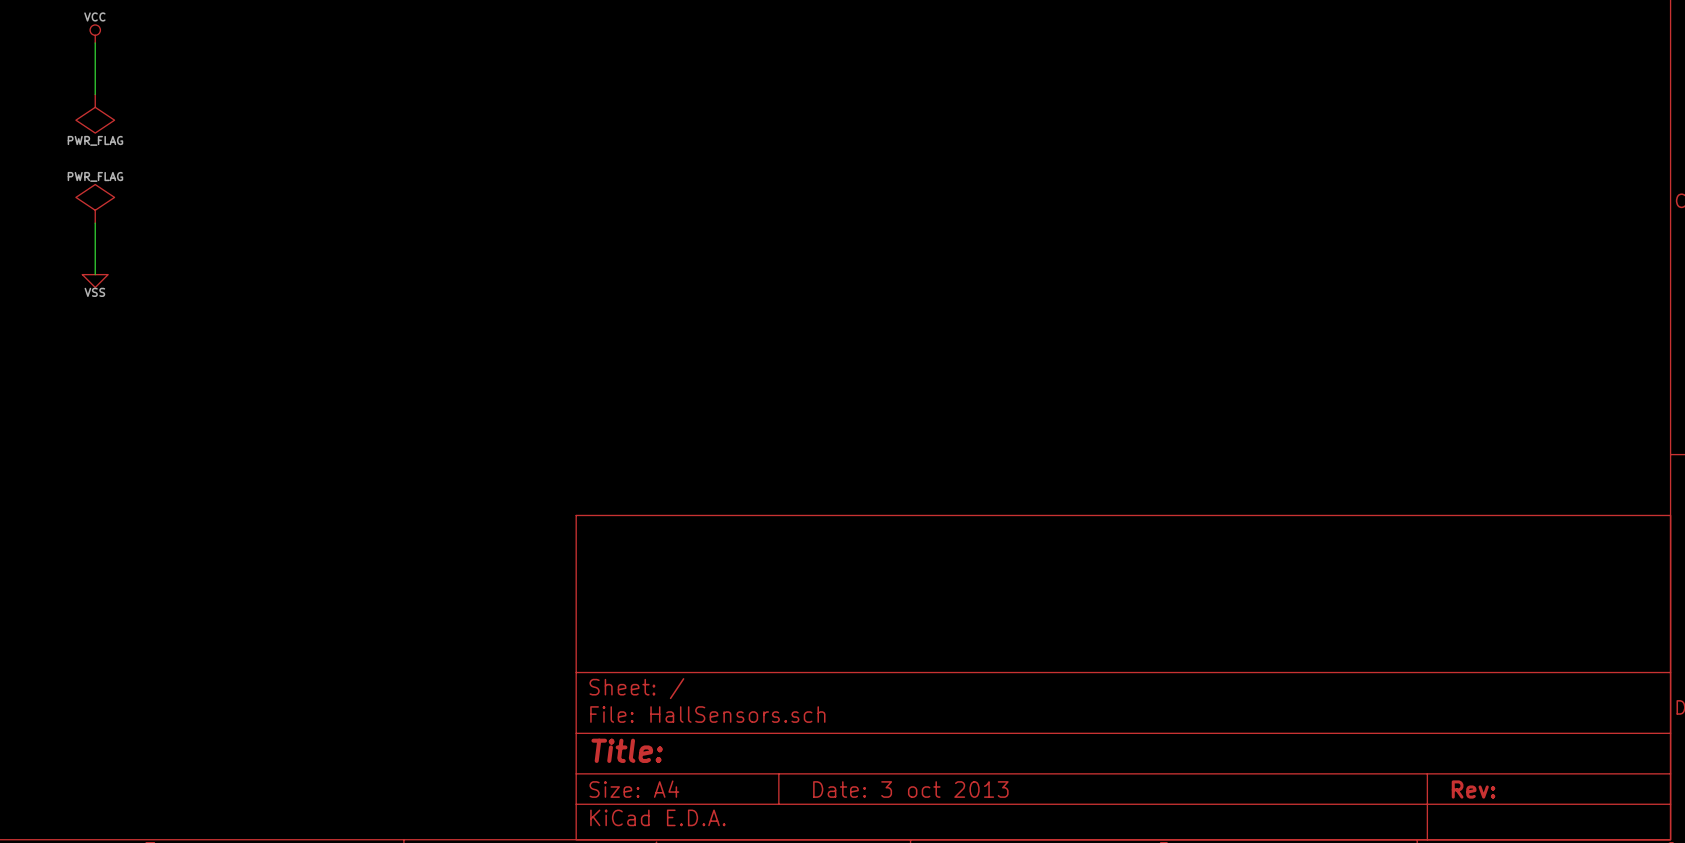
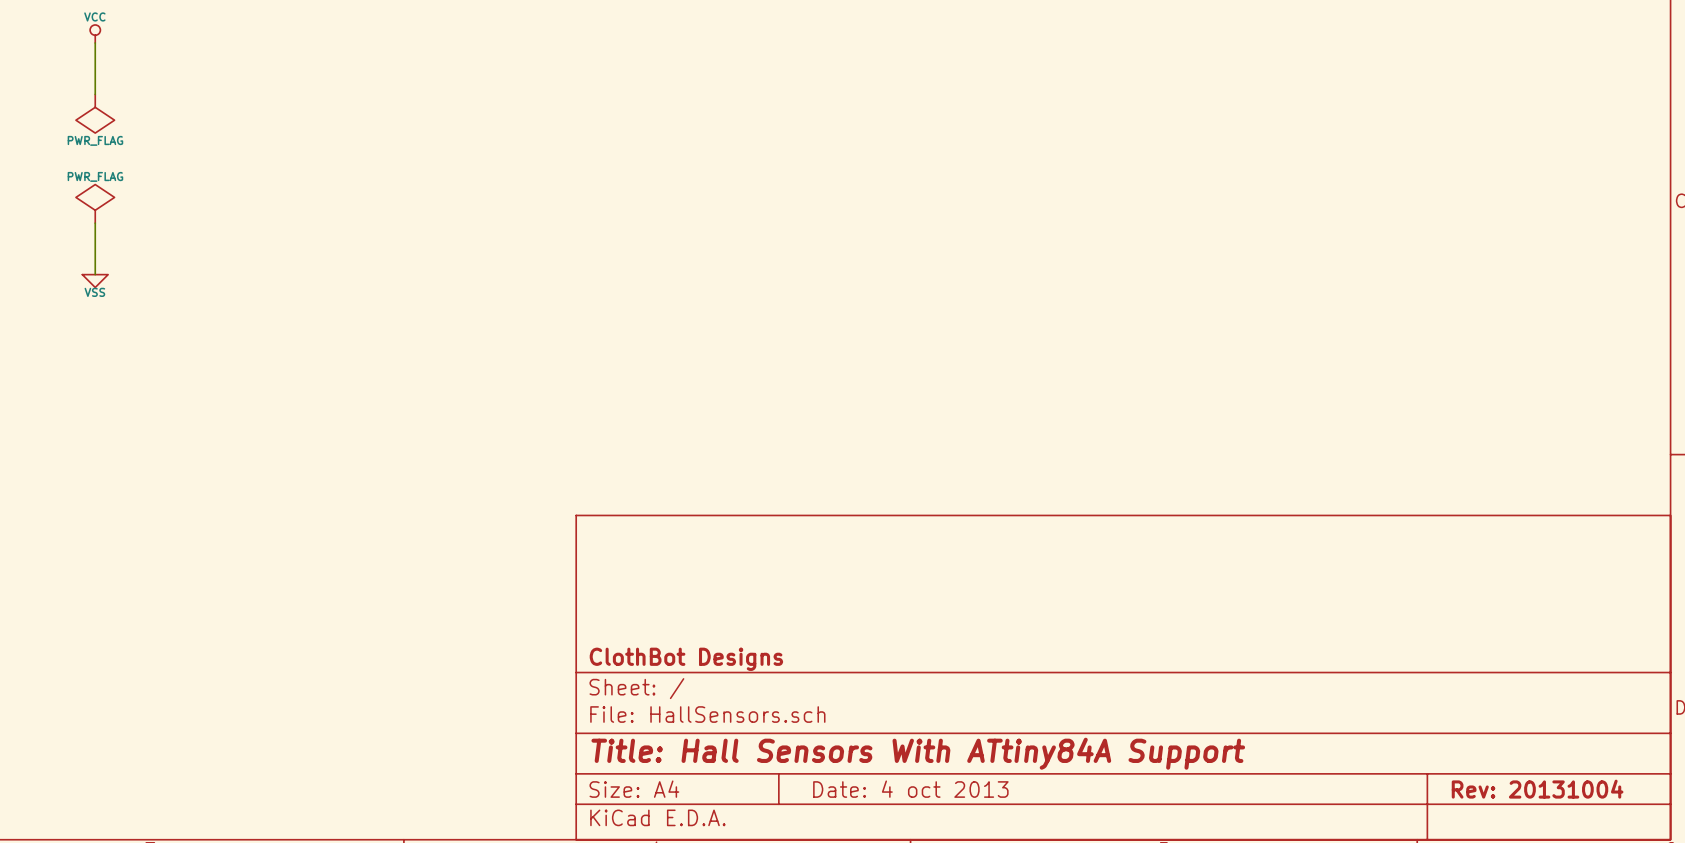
title block: none -> ClothBot Designs (686, 659)
title block: Title: (627, 750) -> Title: Hall Sensors With ATtiny84A Support (918, 753)
title block: Date: 3 oct 2013 (910, 789) -> Date: 4 oct 2013 (910, 789)
title block: Rev: (1473, 789) -> Rev: 20131004 (1537, 789)

